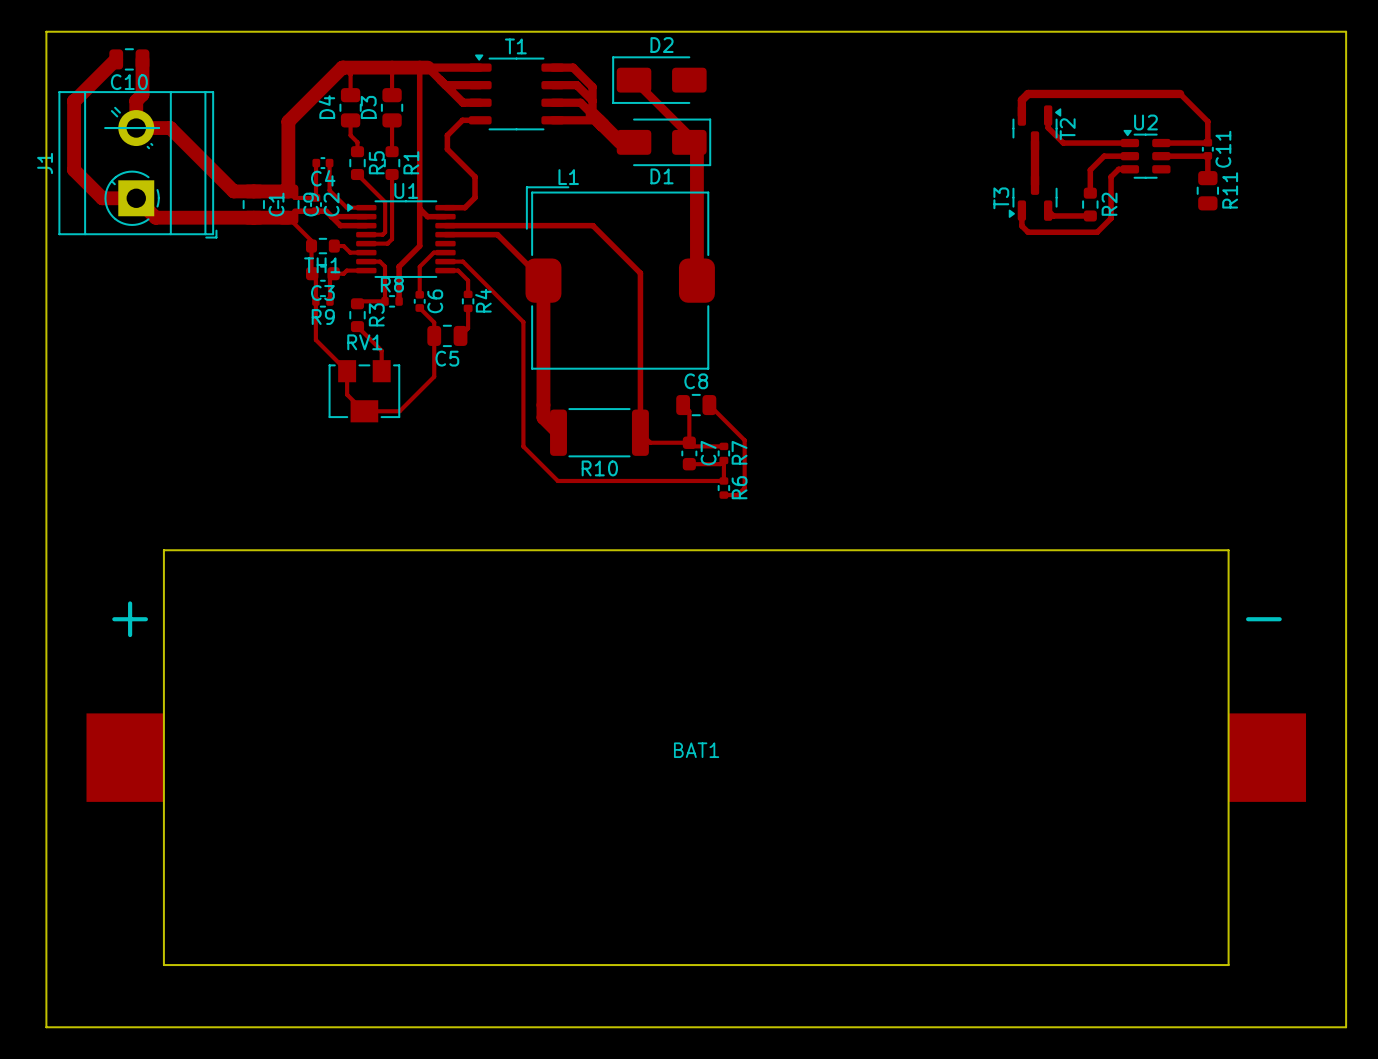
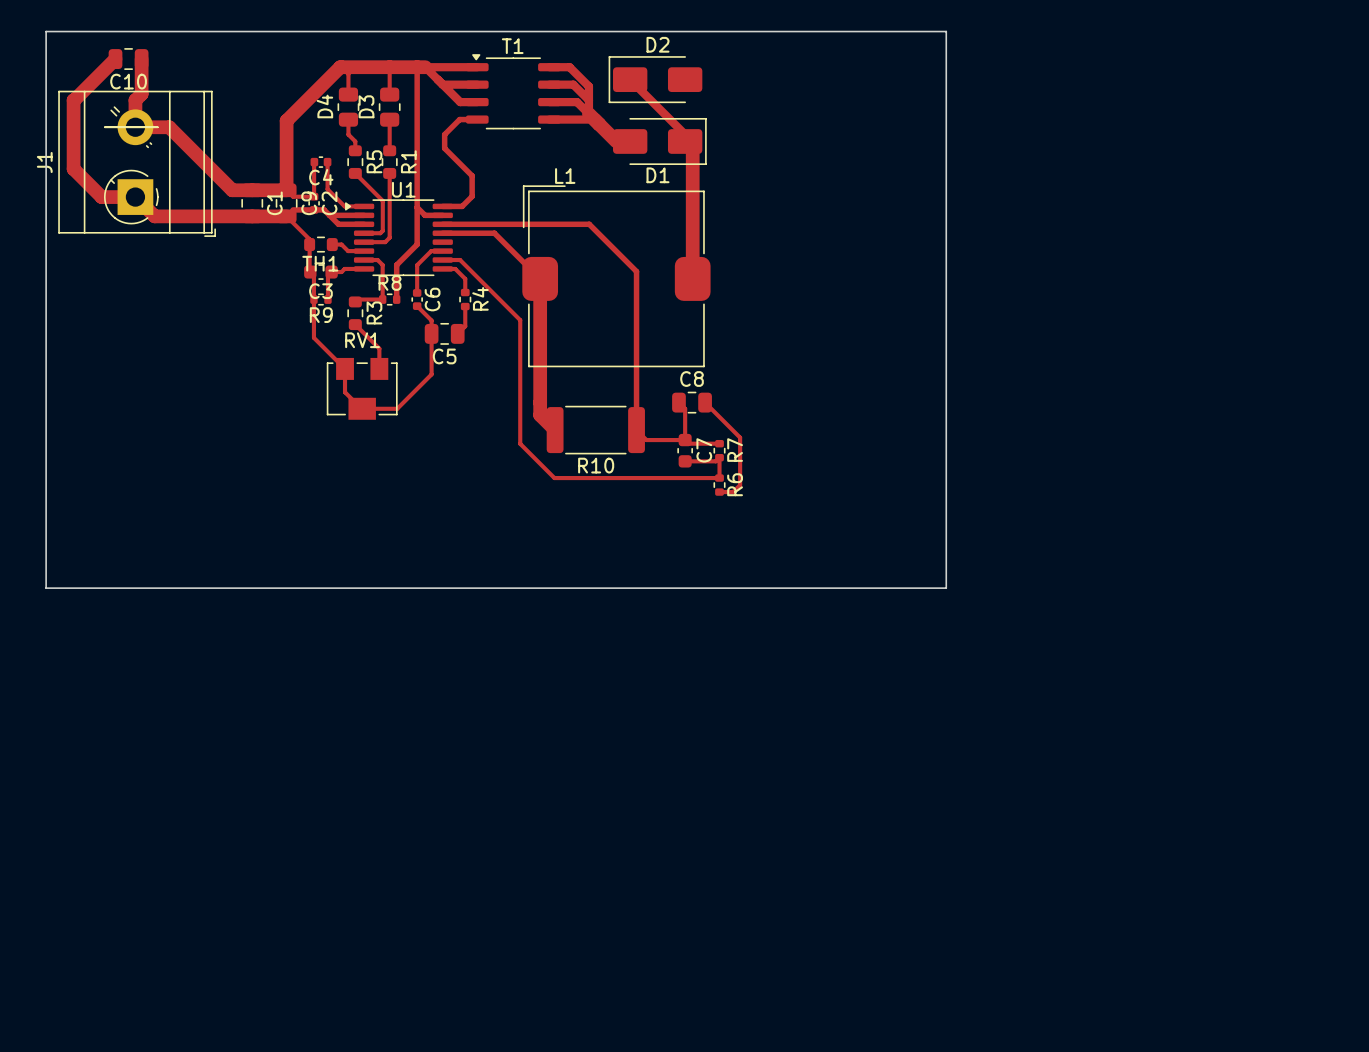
board edge: (952, 31) (1346, 31) (1346, 1027) (46, 1027) (46, 591) -> (946, 31) (946, 588) (46, 588)
track: (1021, 115) (1021, 100) (1028, 93) (1180, 93) (1207, 121) (1207, 142) (1161, 143) -> none
track: (1048, 115) (1048, 127) (1063, 143) (1129, 143) -> none
T2: (1036, 128) -> none
track: (1035, 141) (1035, 184) -> none
C11: (1207, 149) -> none
U2: (1145, 154) -> none
track: (1129, 156) (1104, 156) (1090, 170) (1090, 193) -> none
track: (1161, 156) (1207, 155) (1207, 178) -> none
track: (1129, 169) (1118, 169) (1111, 176) (1111, 218) (1097, 232) (1028, 232) (1021, 226) (1021, 210) -> none
R11: (1207, 190) -> none
T3: (1033, 197) -> none
R2: (1090, 204) -> none
track: (1048, 210) (1053, 215) (1090, 215) -> none
BAT1: (696, 757) -> none

